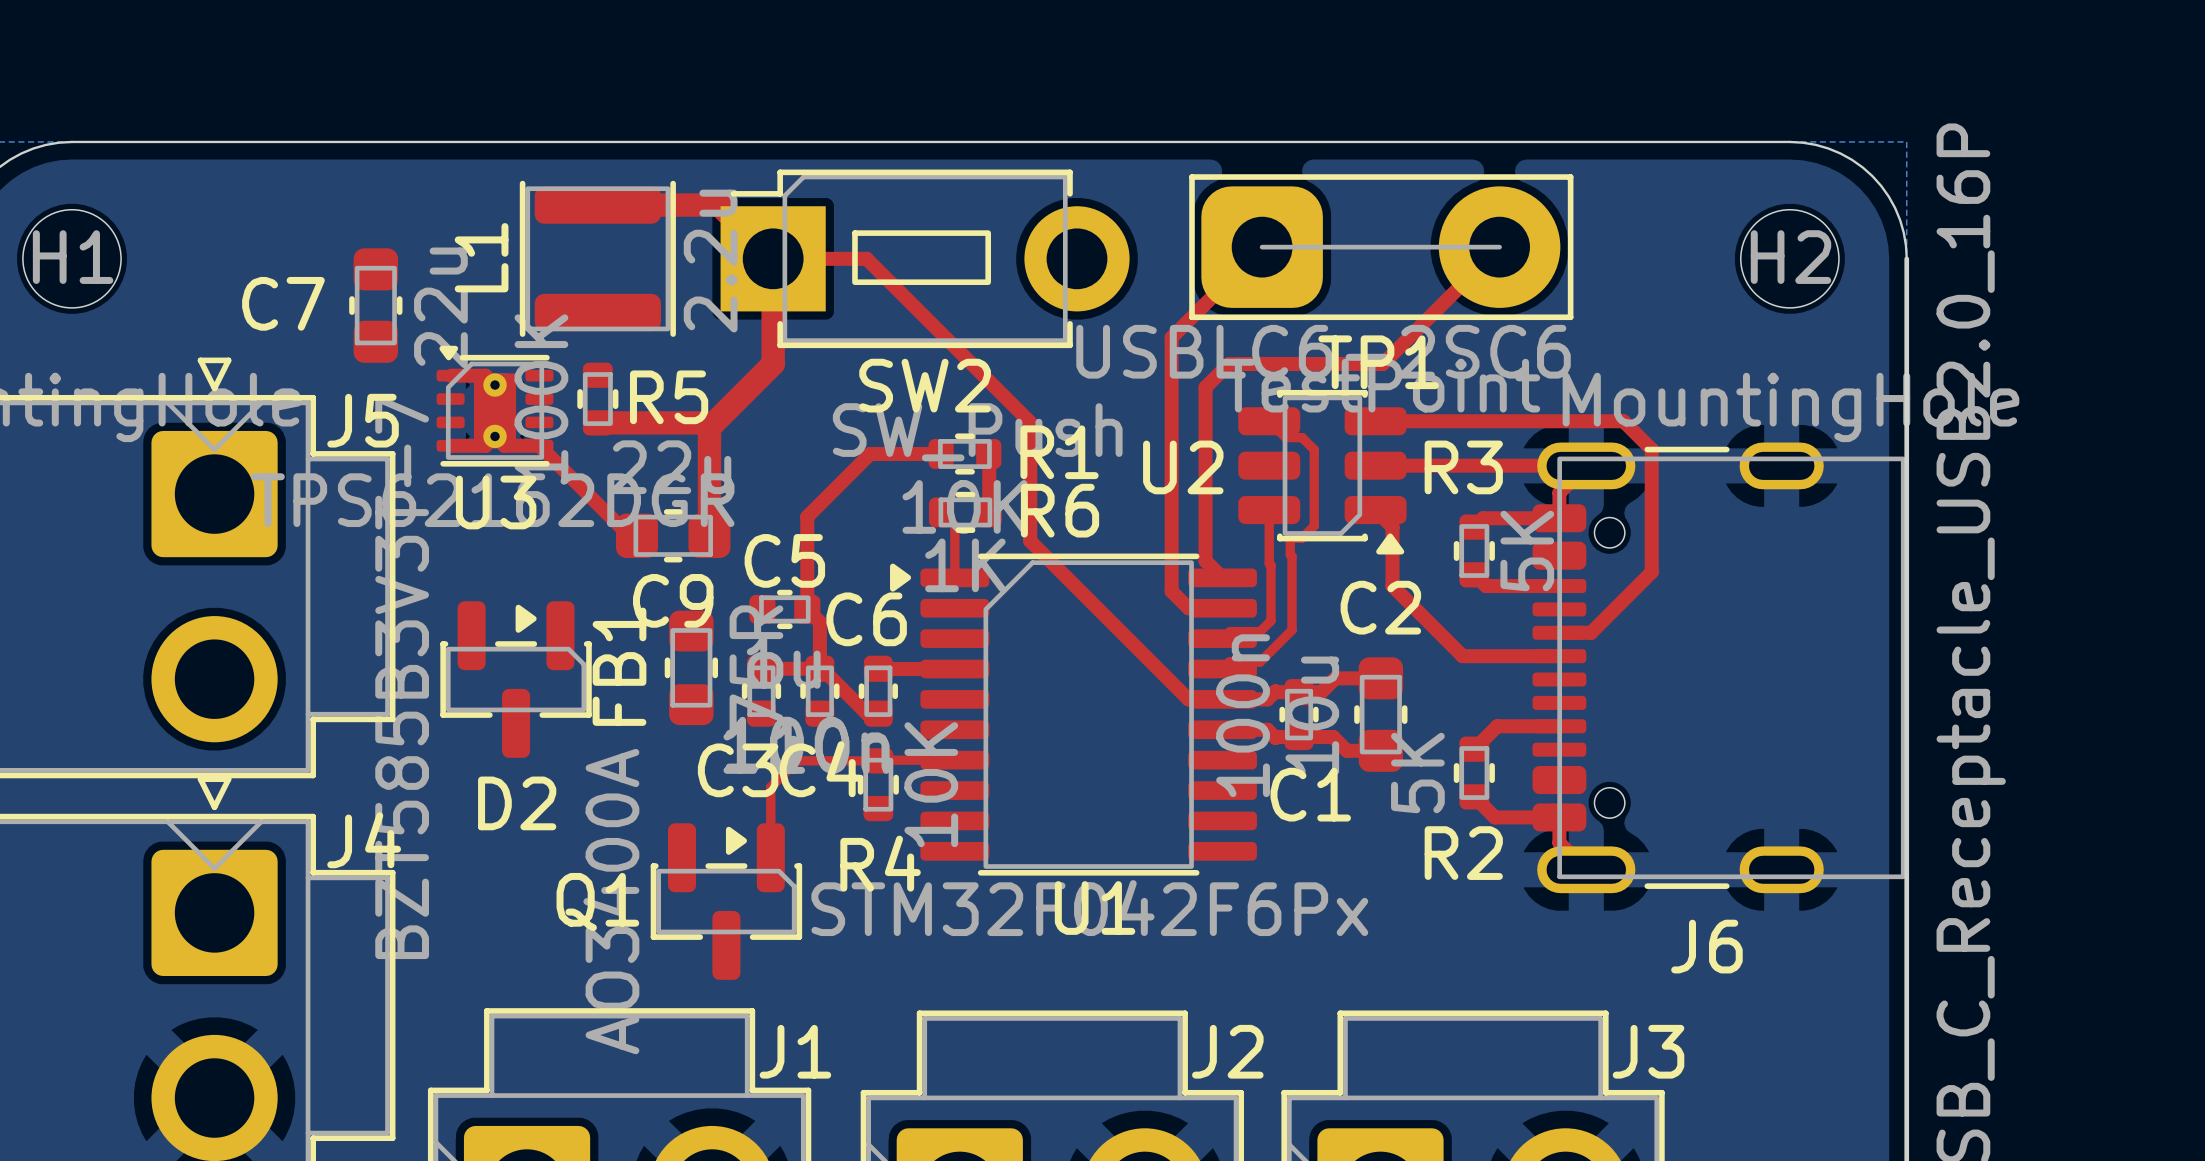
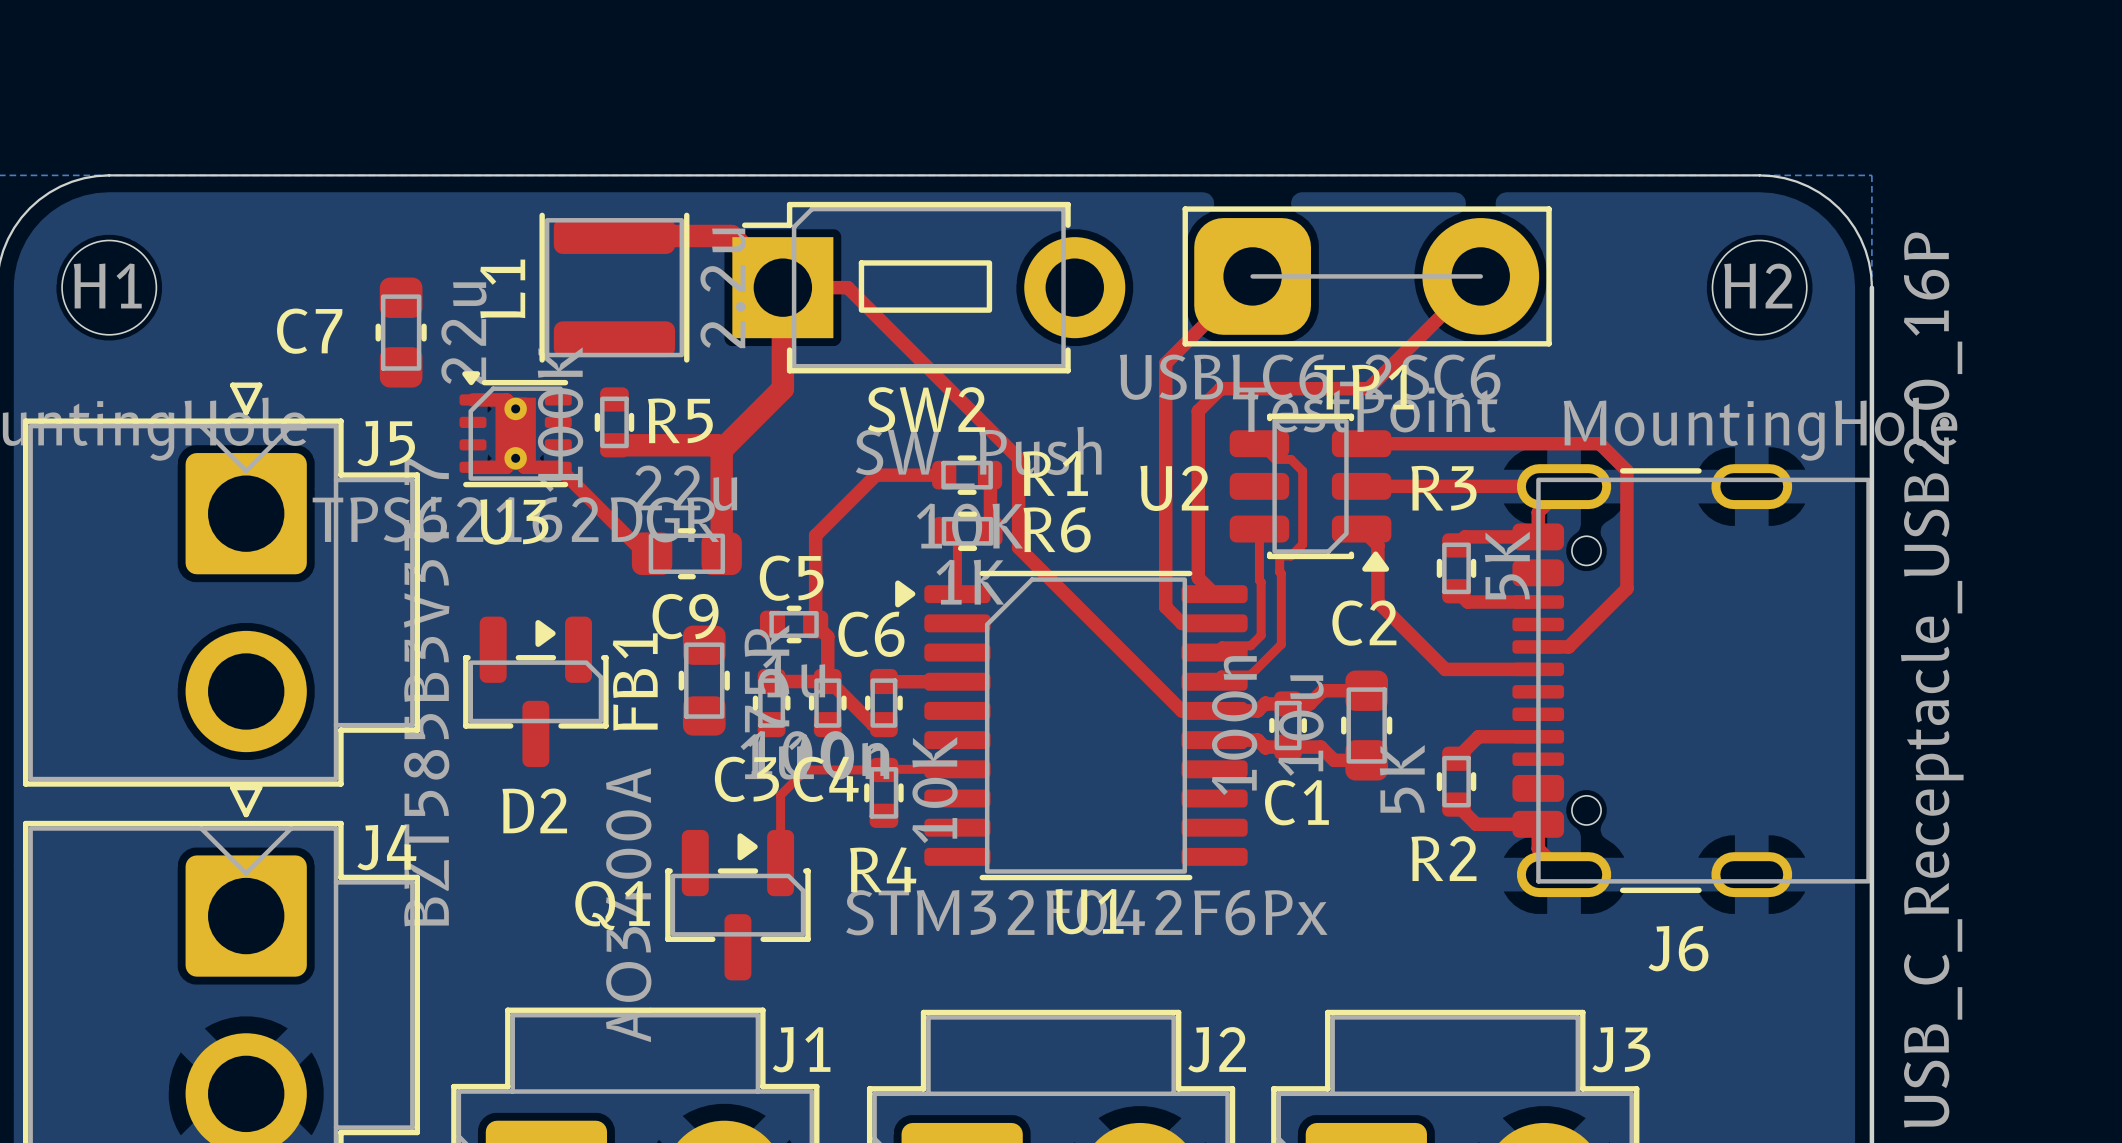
top track: (840, 258) (866, 258) (1030, 422) (1030, 541) -> (847, 287) (1018, 458) (1018, 547) (1029, 558)

